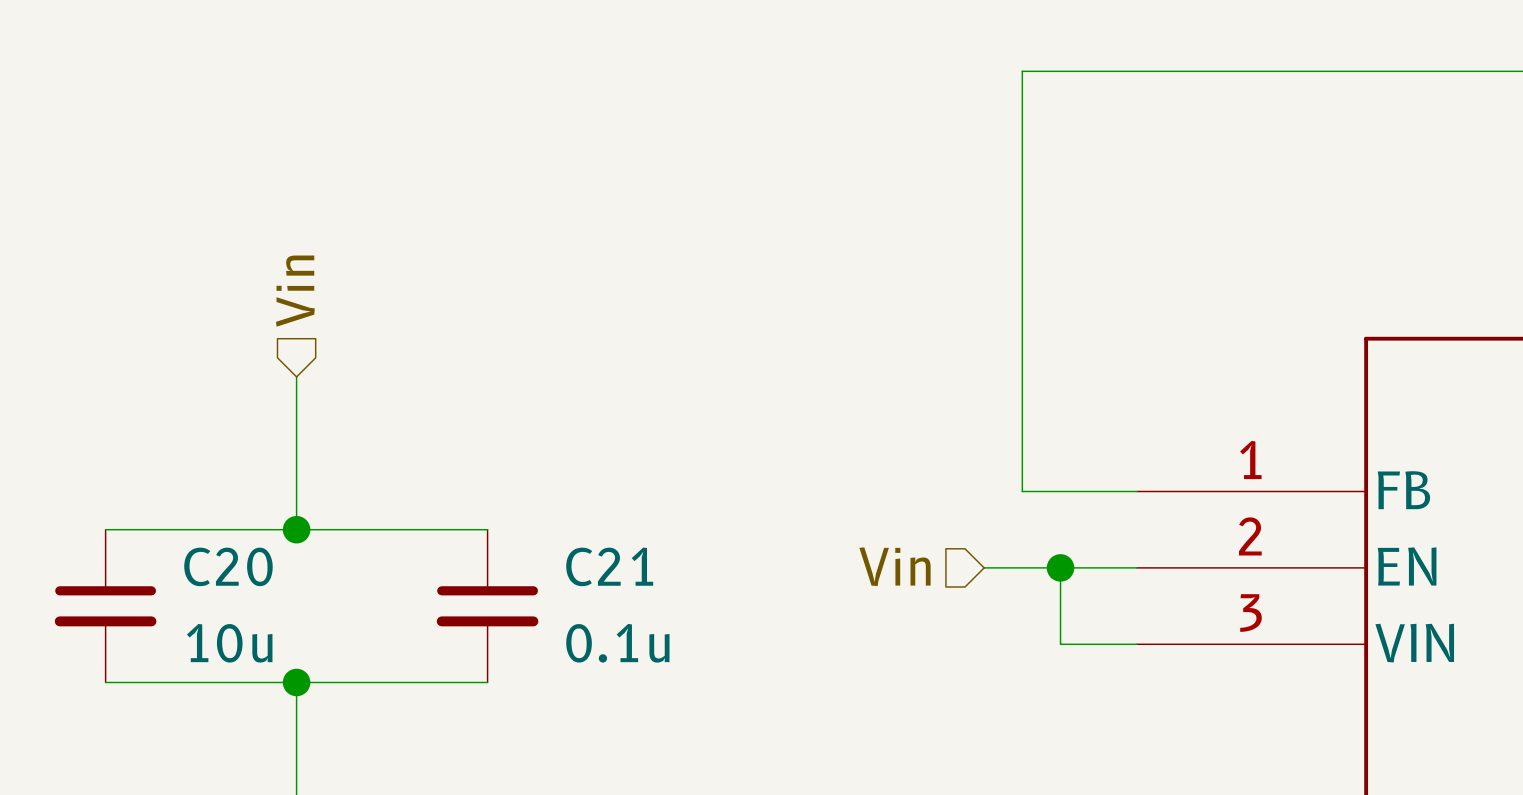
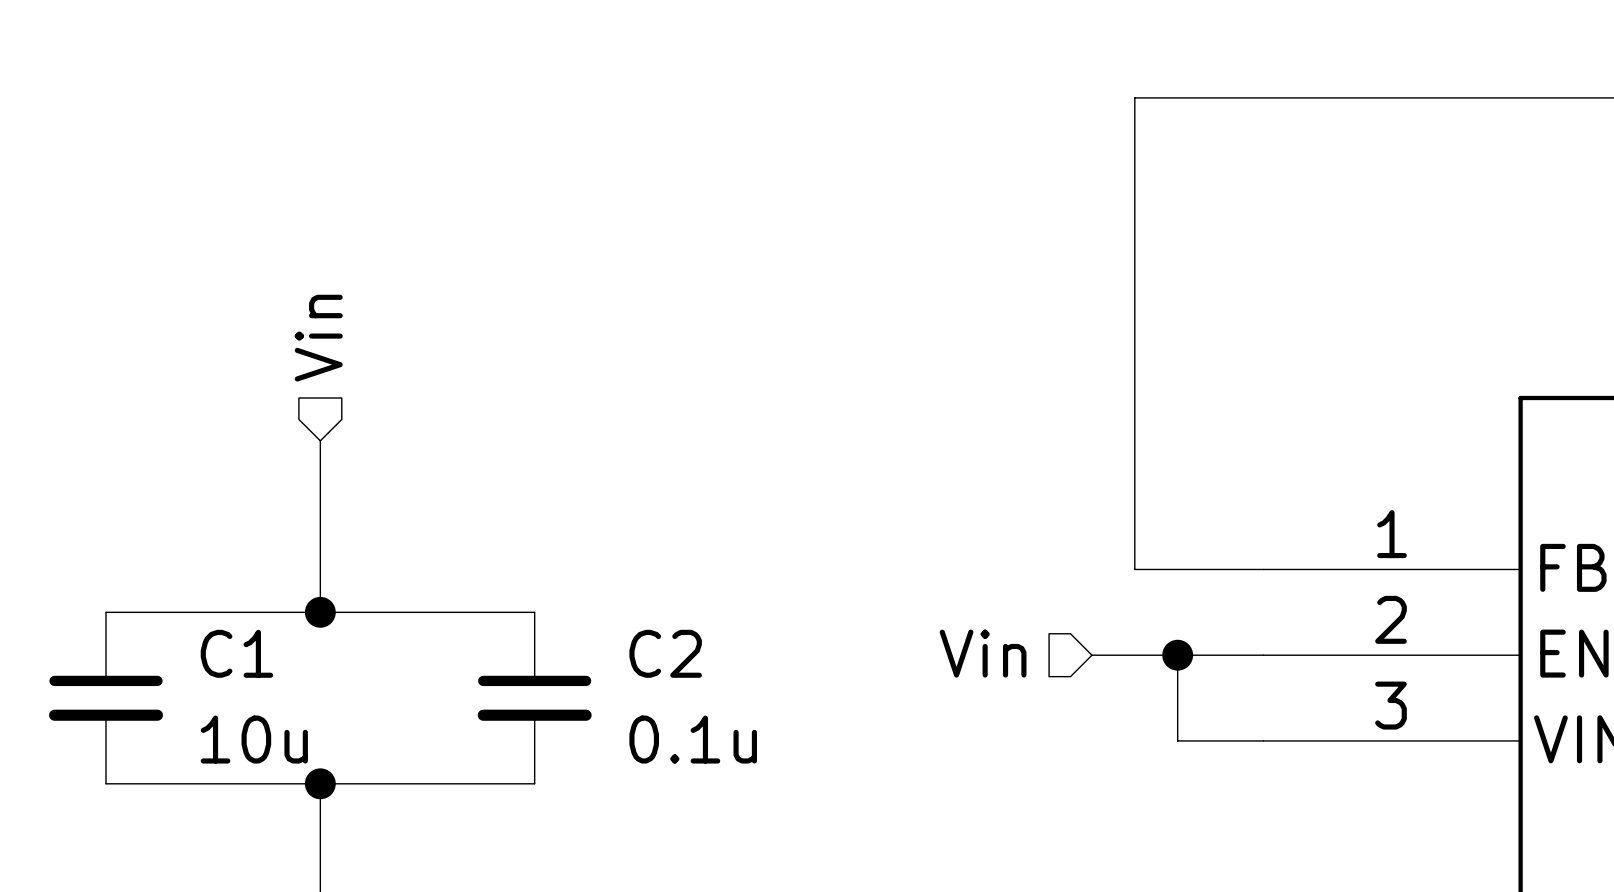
C20 name: C20 (228, 566) -> C1 (236, 653)
C21 name: C21 (609, 566) -> C2 (665, 653)

